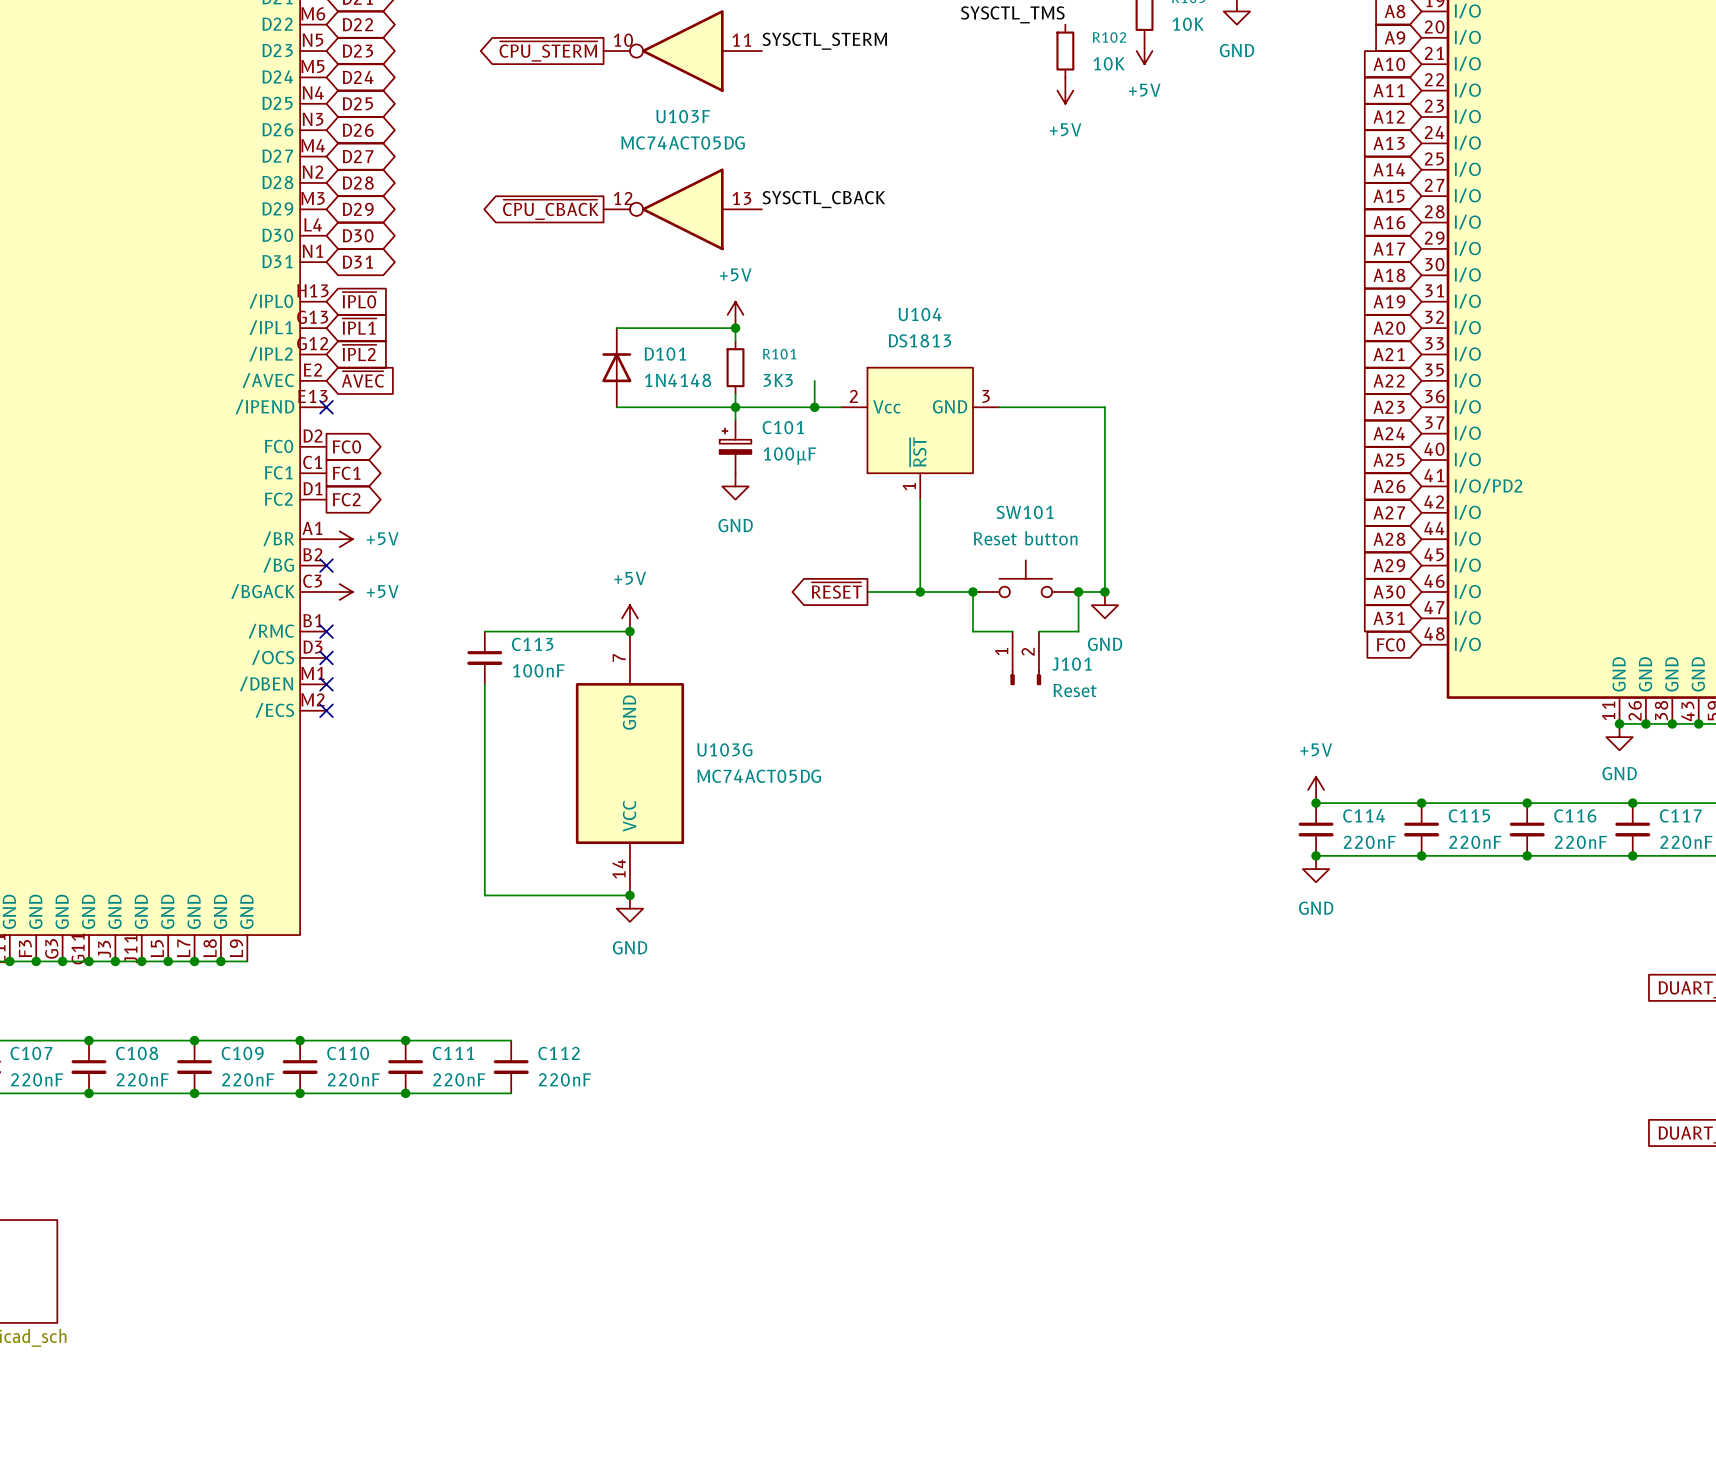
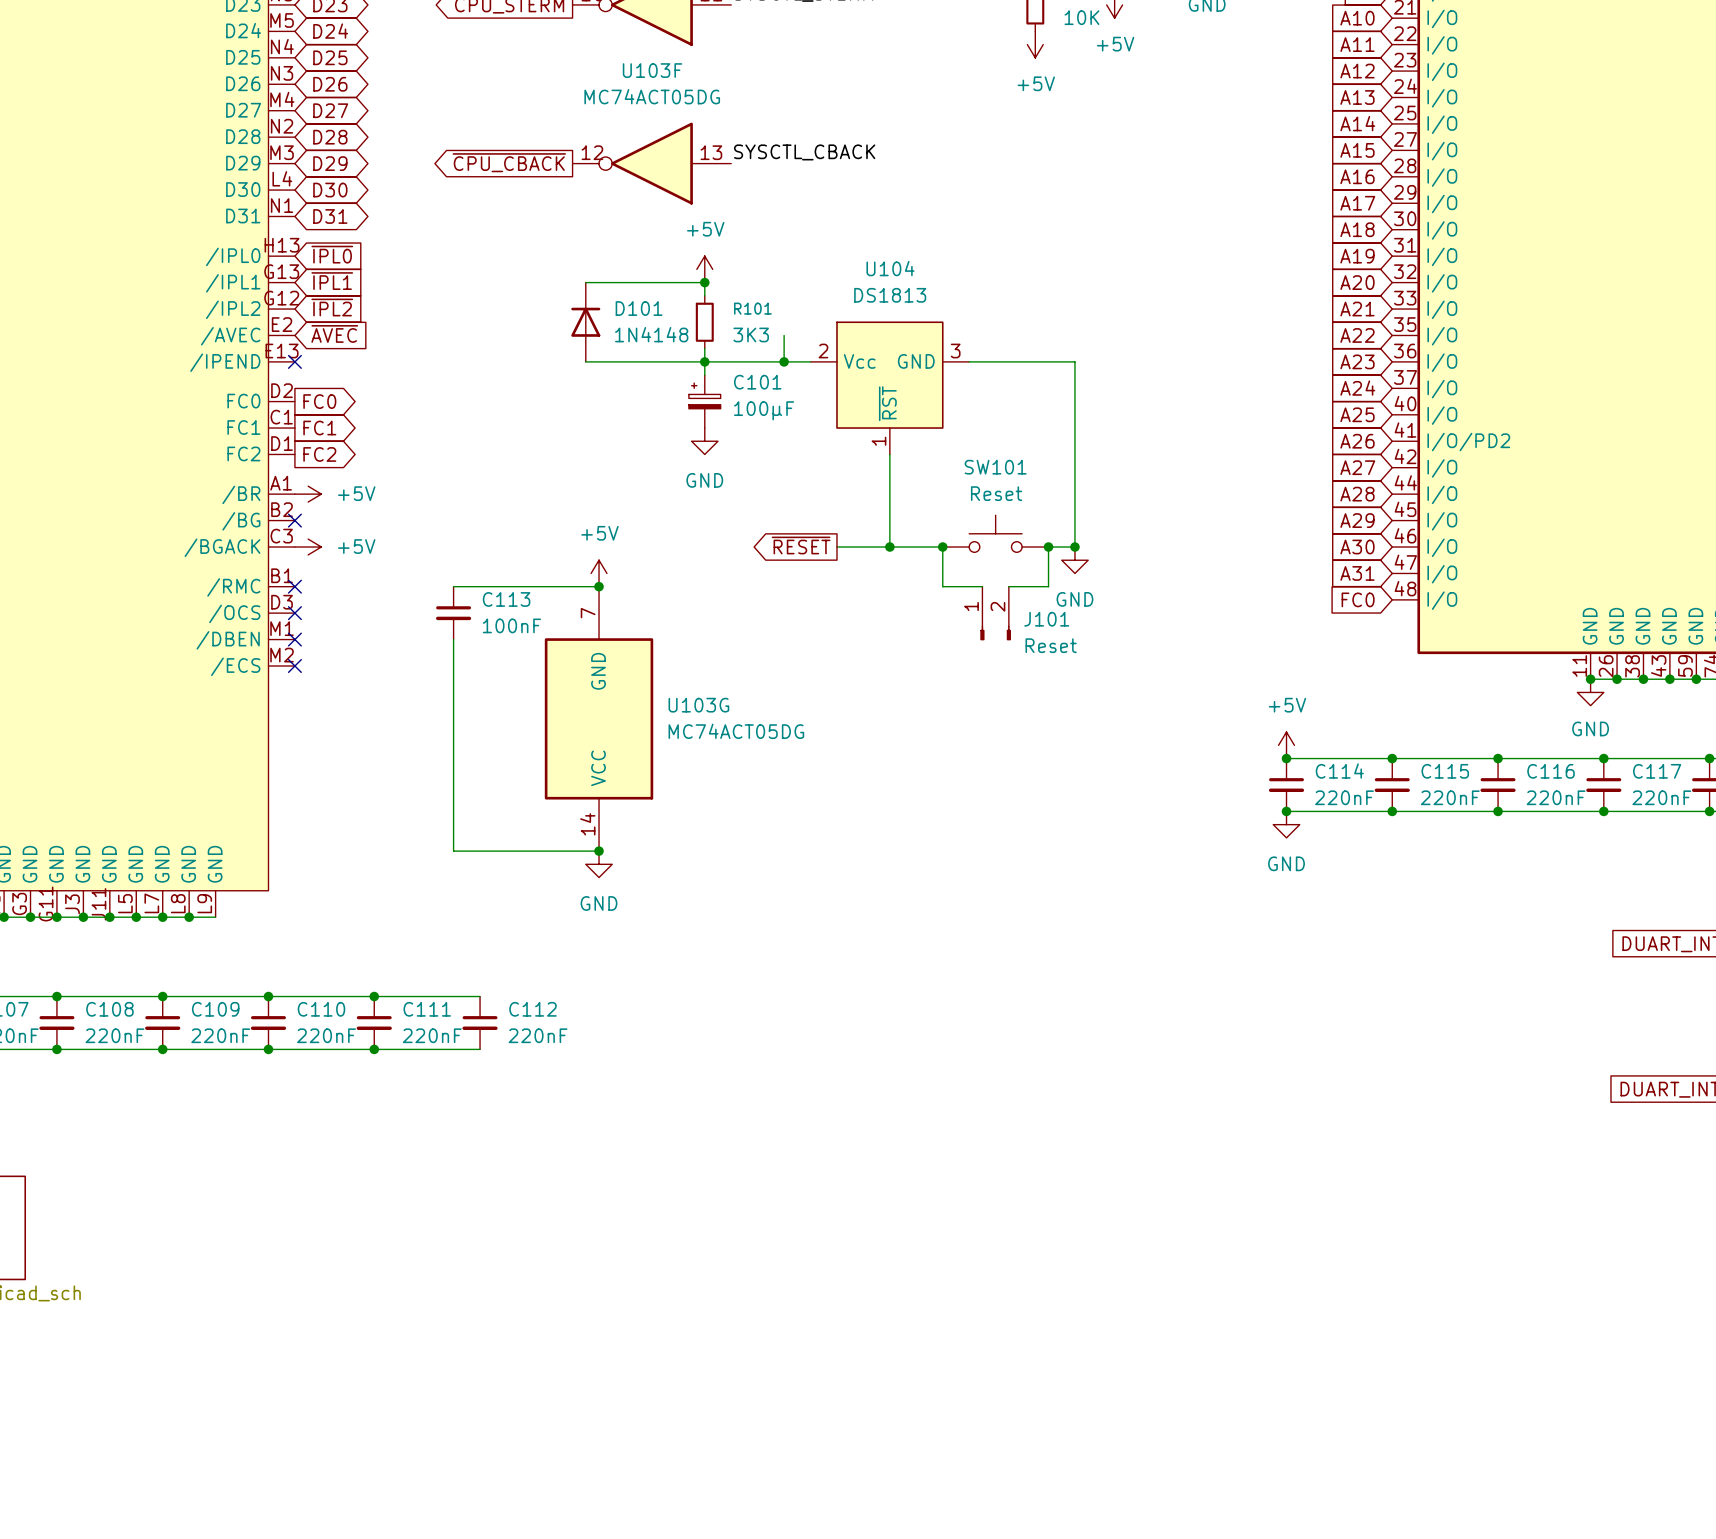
SW101 value: Reset button (1025, 538) -> Reset (996, 493)

